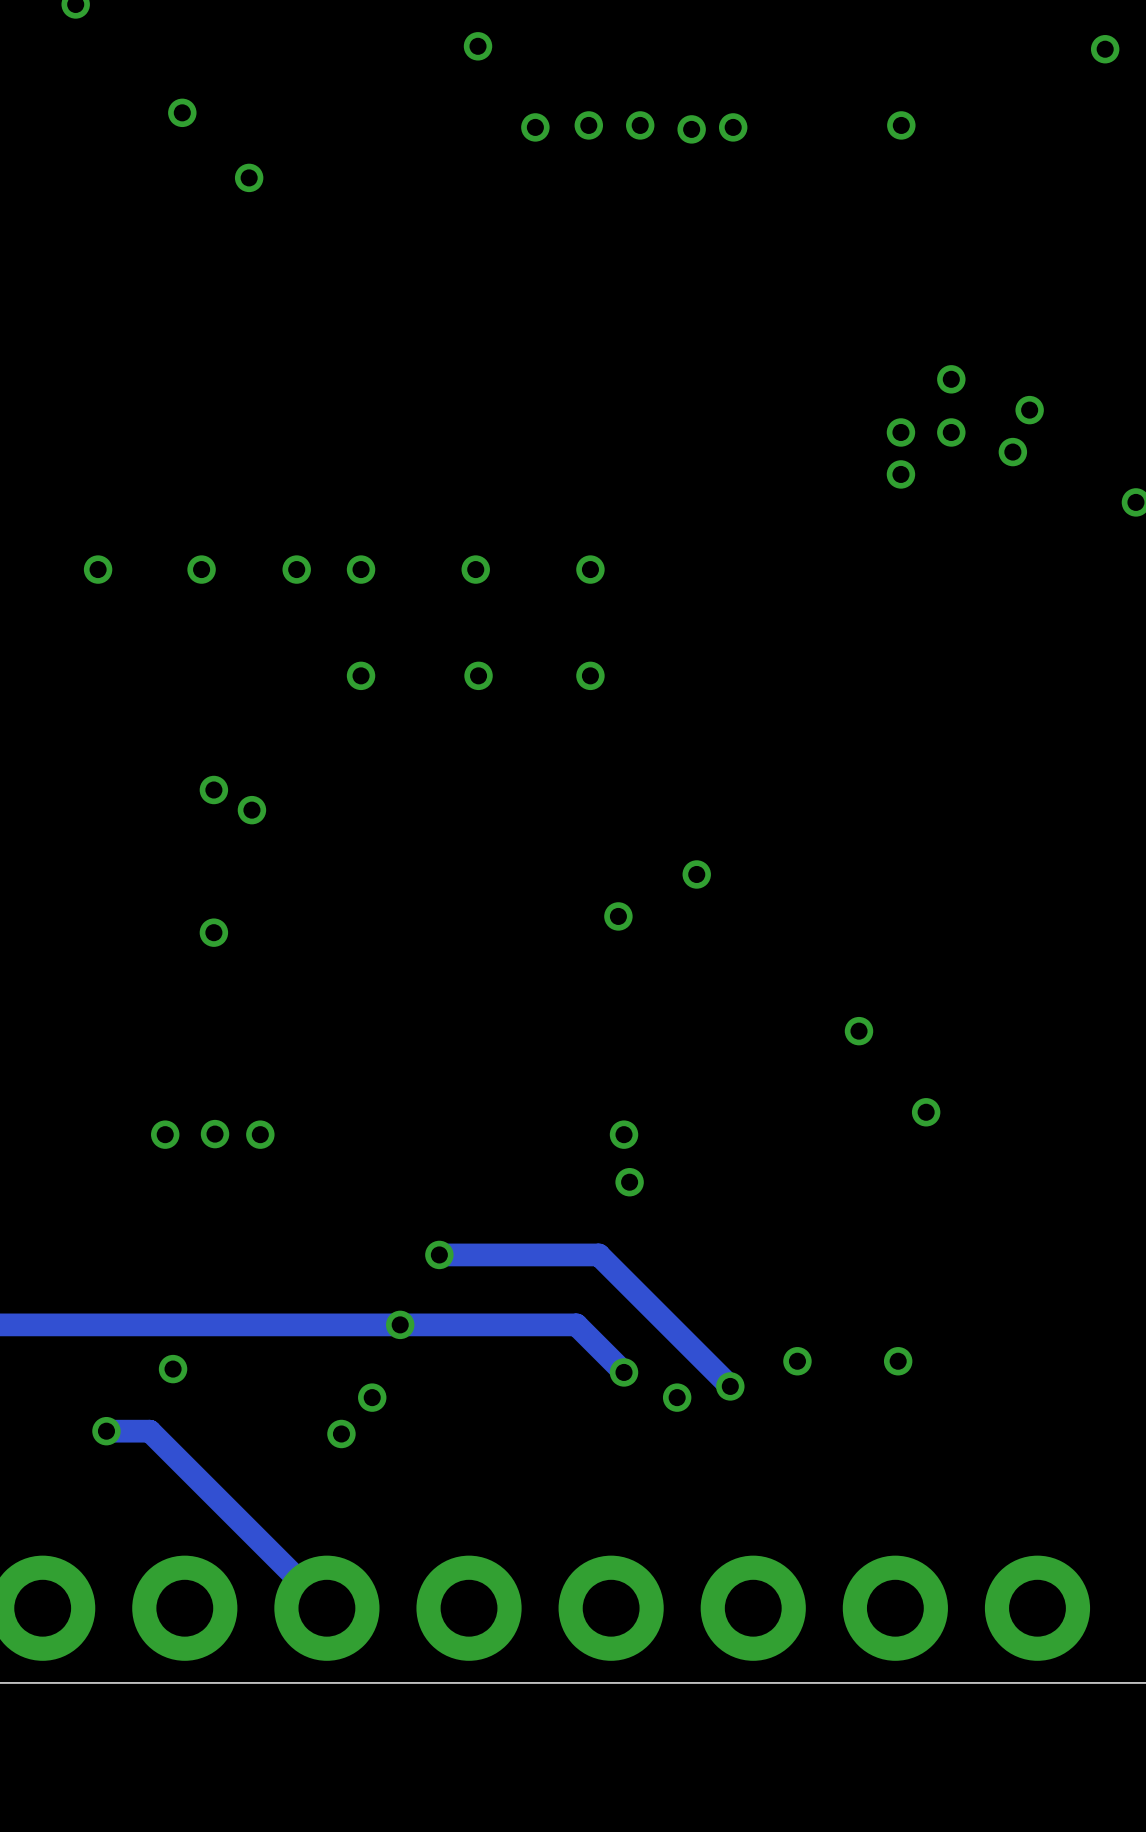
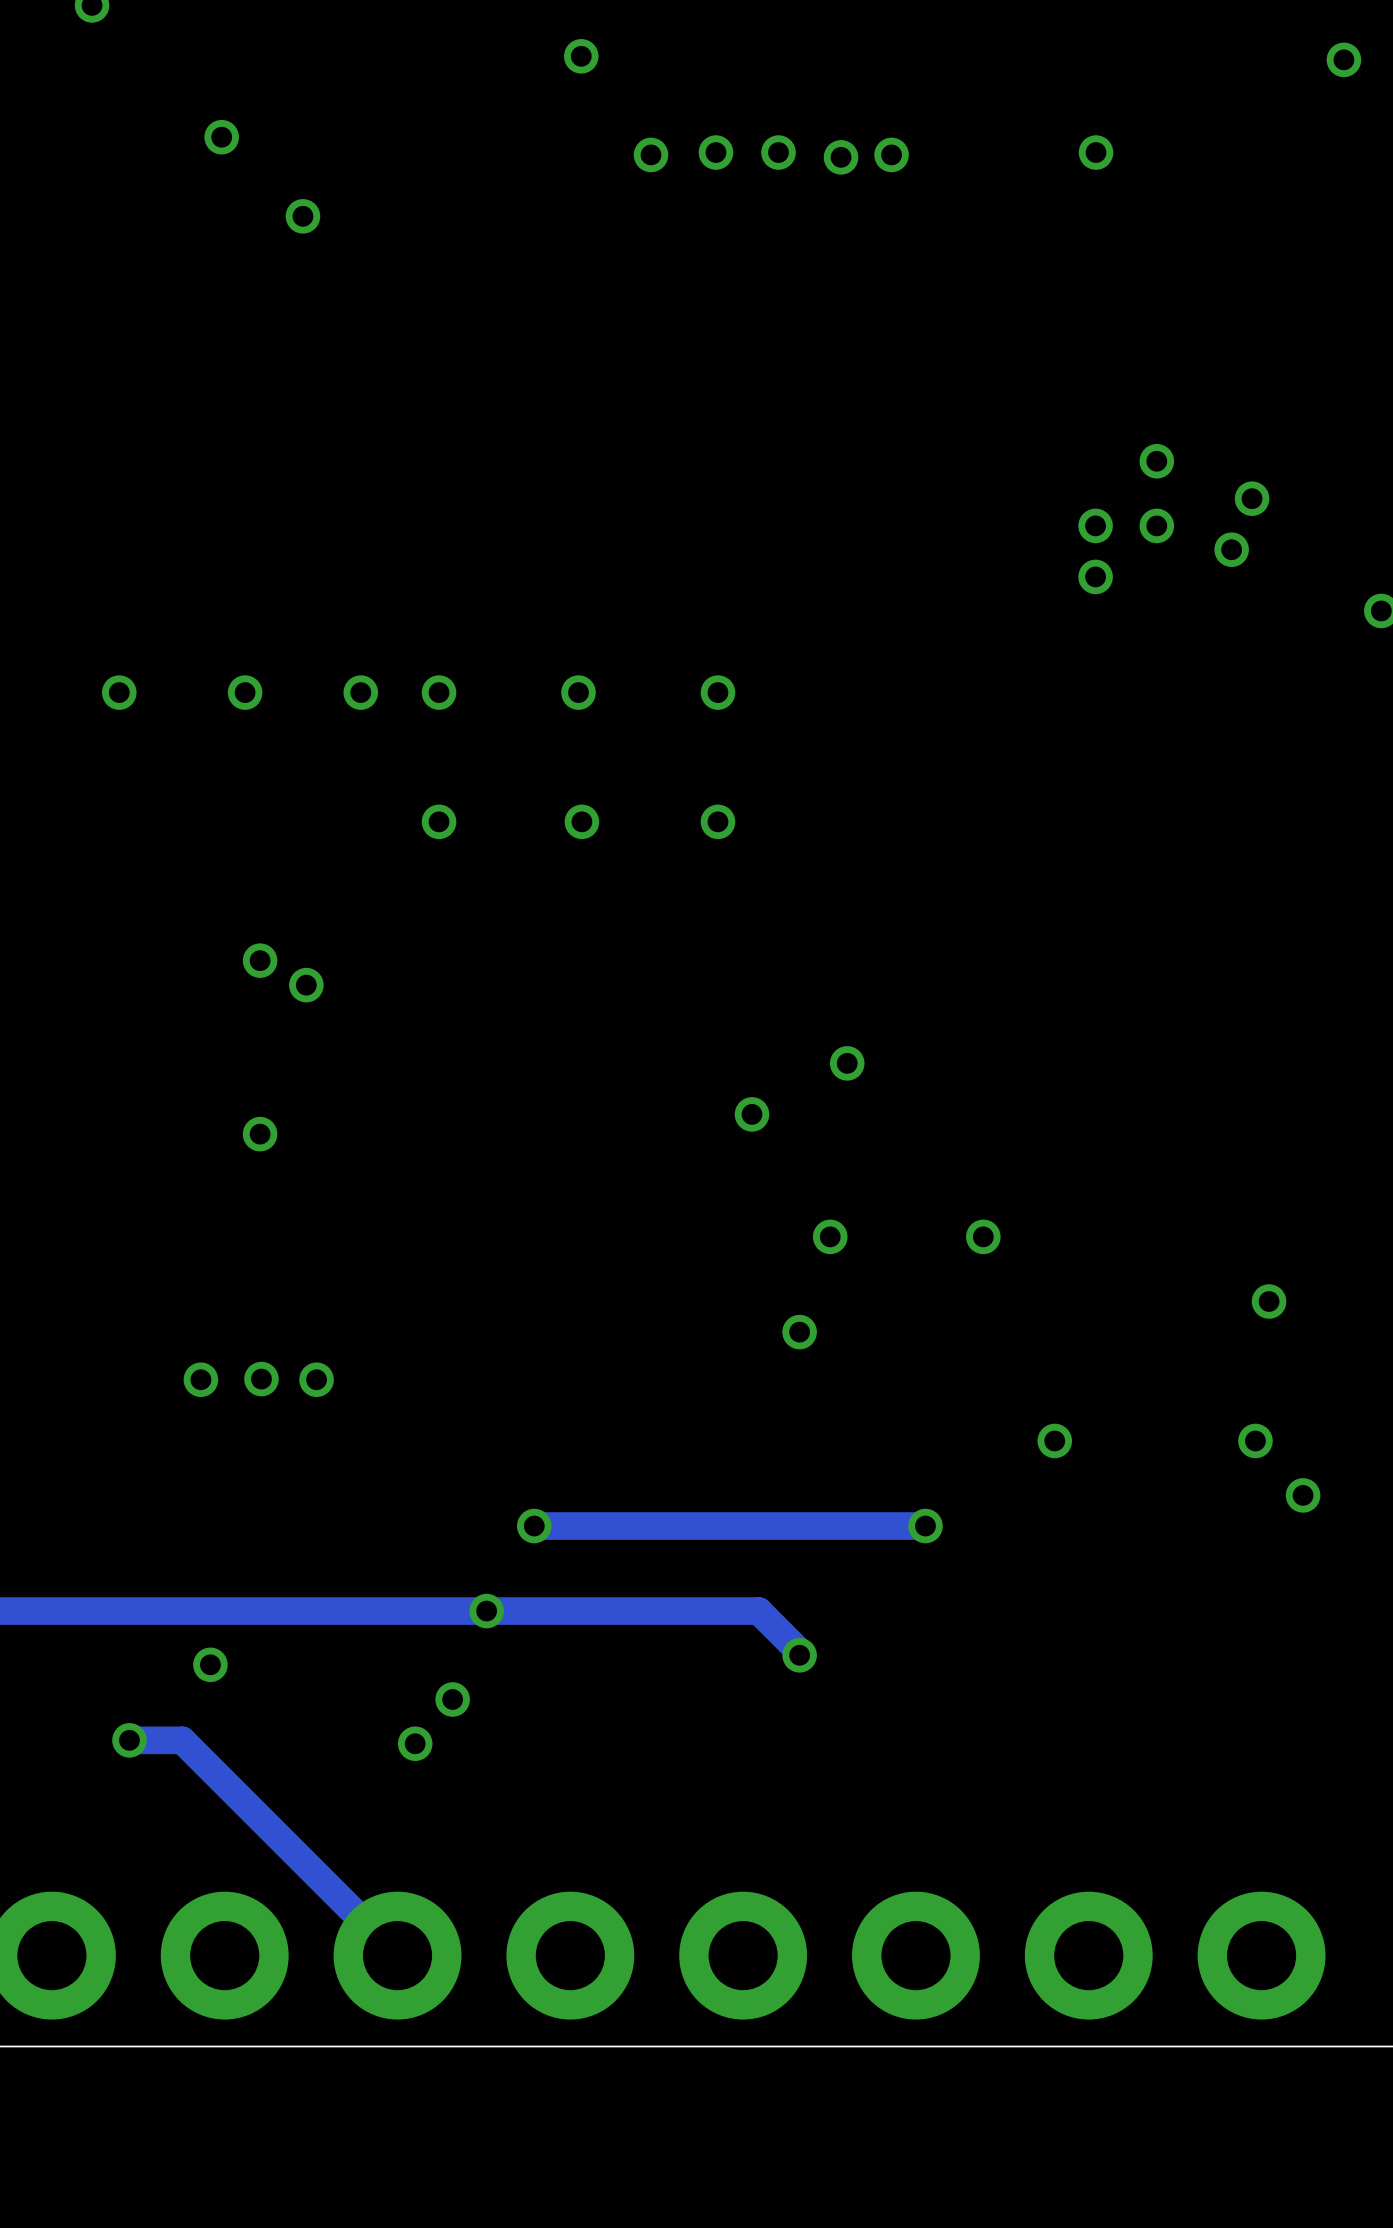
via: none -> (830, 1236)
via position: (859, 1031) -> (983, 1236)
via: none -> (1269, 1301)
via: none -> (799, 1332)
via: (926, 1112) -> none
via: (624, 1134) -> none
via: (629, 1182) -> none
via: none -> (1054, 1440)
via: none -> (1255, 1440)
via: none -> (1303, 1495)
track: (598, 1254) (730, 1386) -> (728, 1526) (925, 1526)
via: none -> (925, 1526)
track: (576, 1324) (624, 1372) -> (700, 1611) (758, 1611) (799, 1651) (799, 1655)
via: none -> (799, 1655)
via: (797, 1361) -> none
via: (898, 1361) -> none
via: (624, 1372) -> none
via: (730, 1386) -> none
via: (677, 1397) -> none

